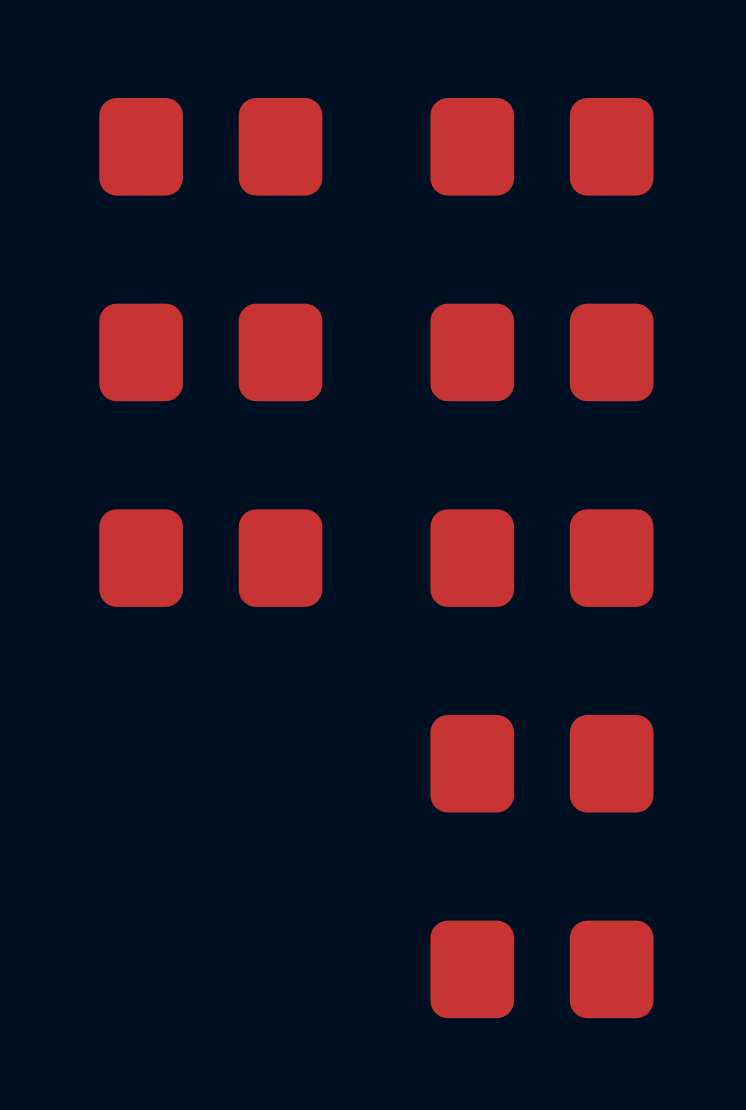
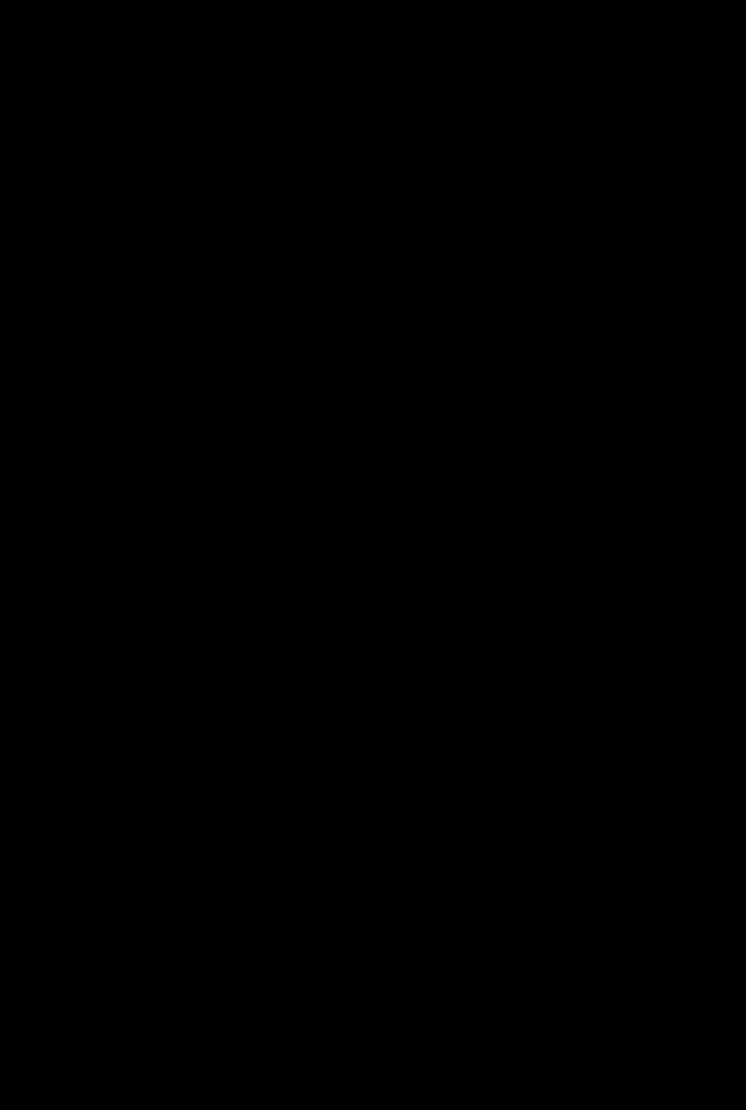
part: (210, 146) -> none
part: (541, 146) -> none
part: (210, 352) -> none
part: (541, 352) -> none
part: (210, 558) -> none
part: (541, 558) -> none
part: (541, 763) -> none
part: (541, 969) -> none

